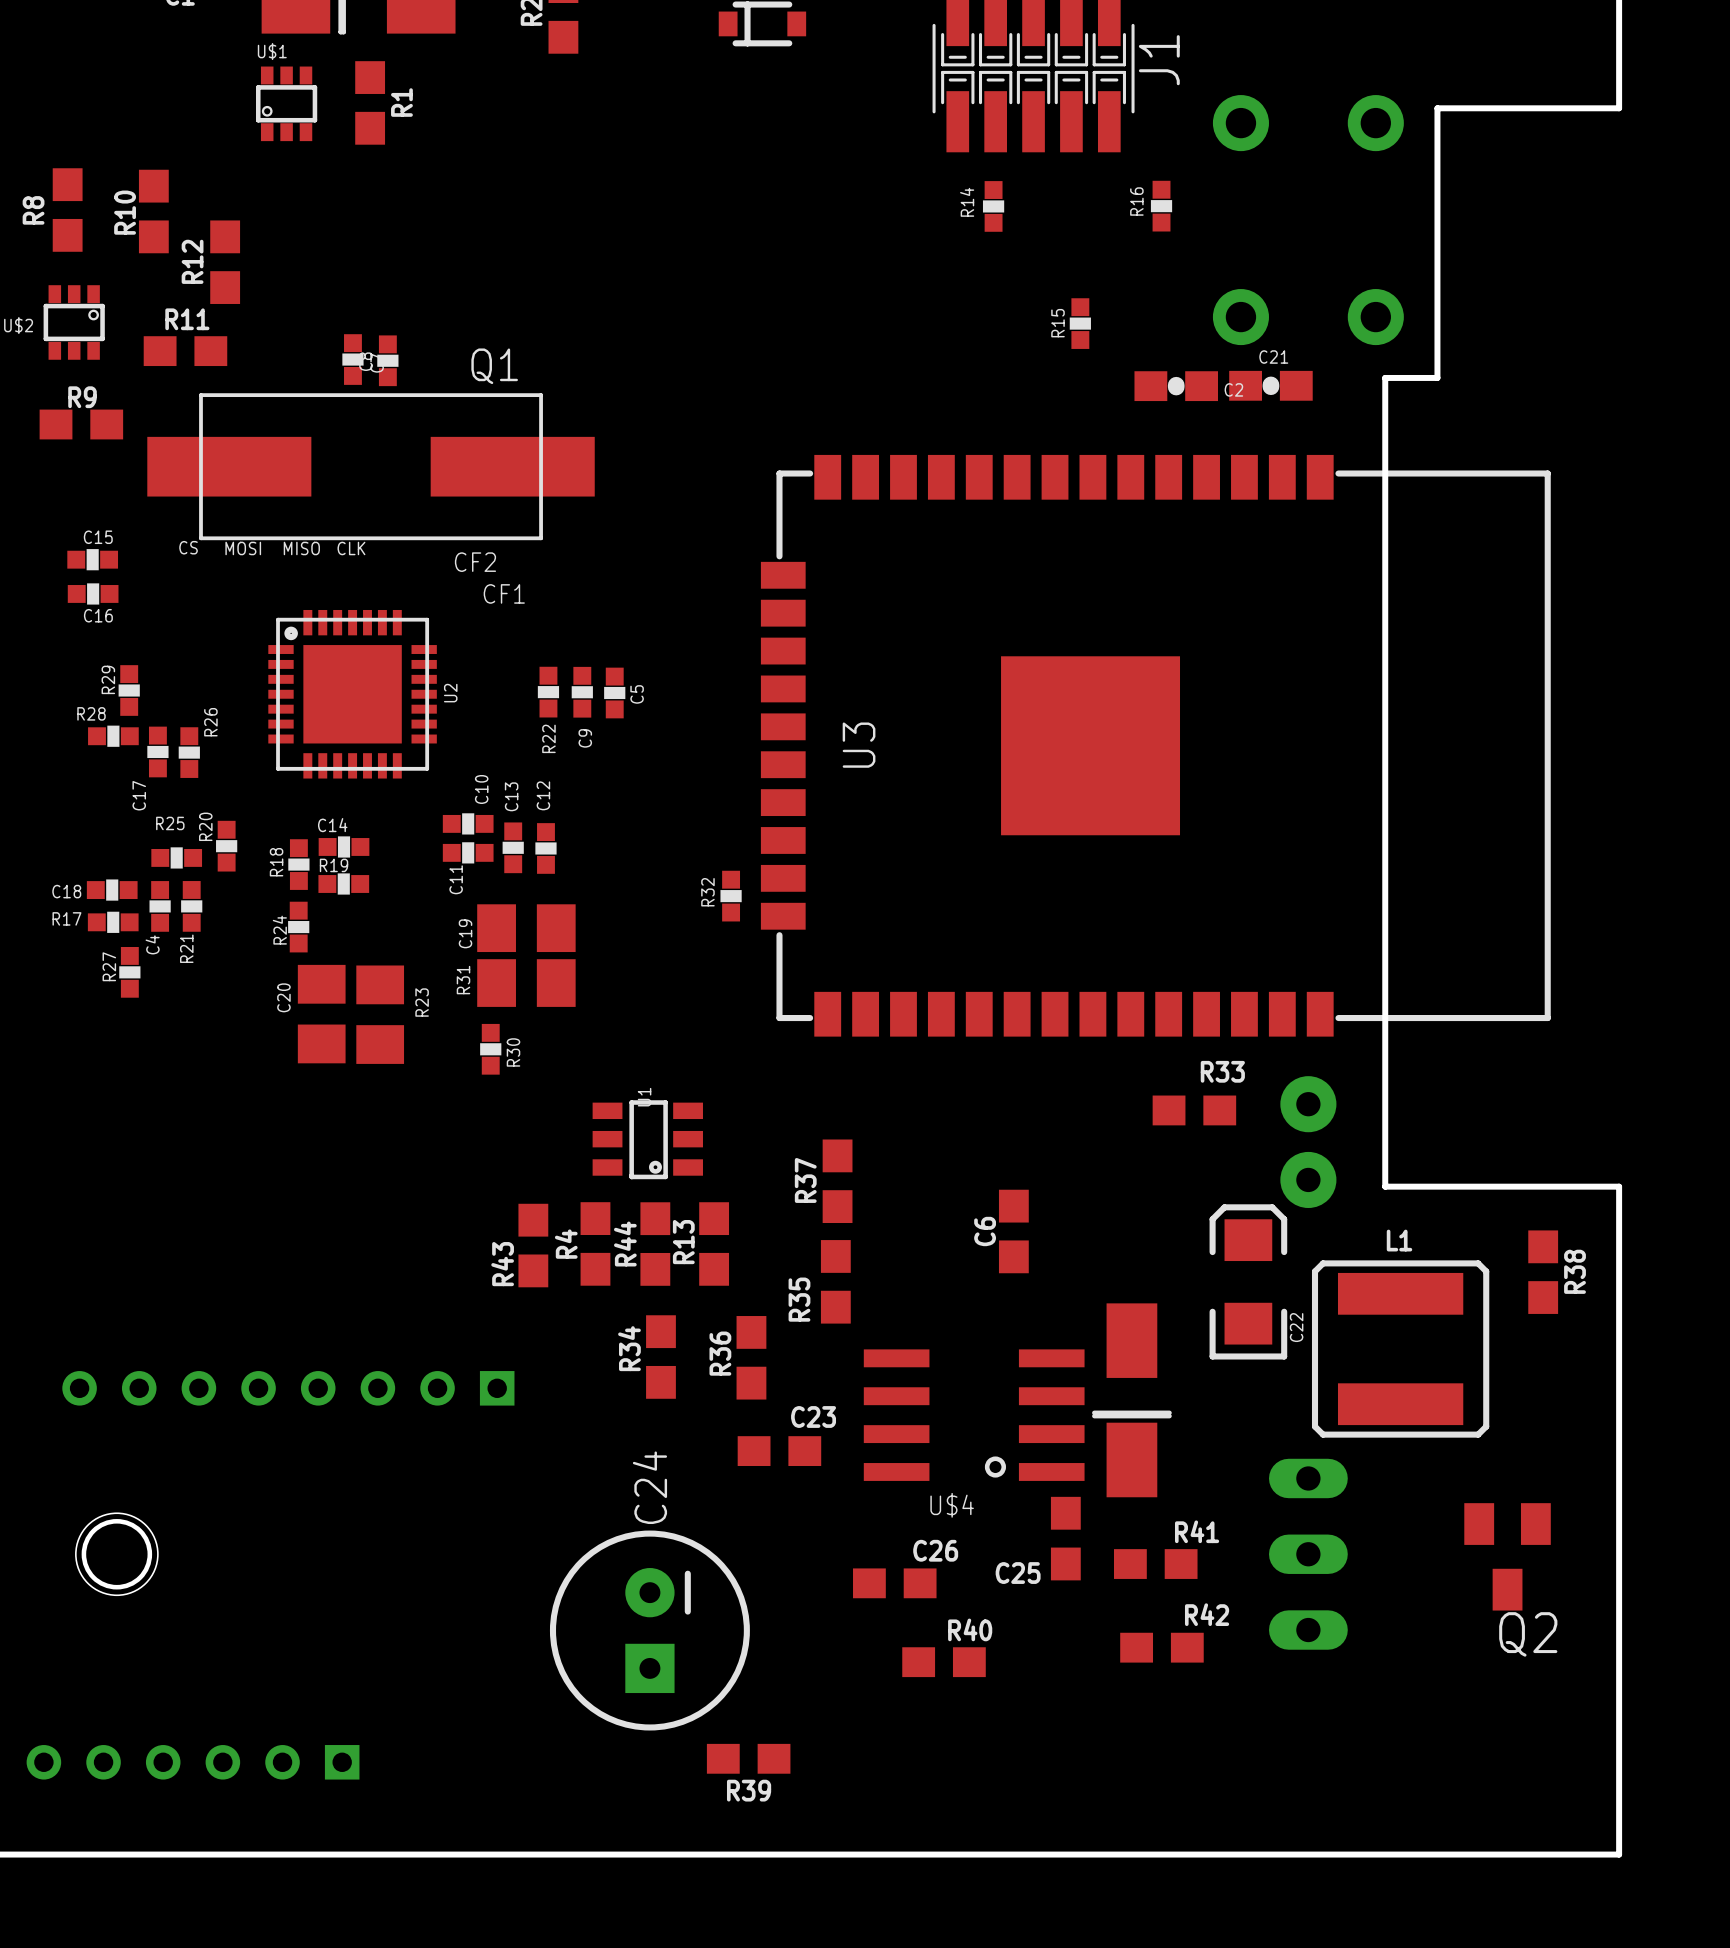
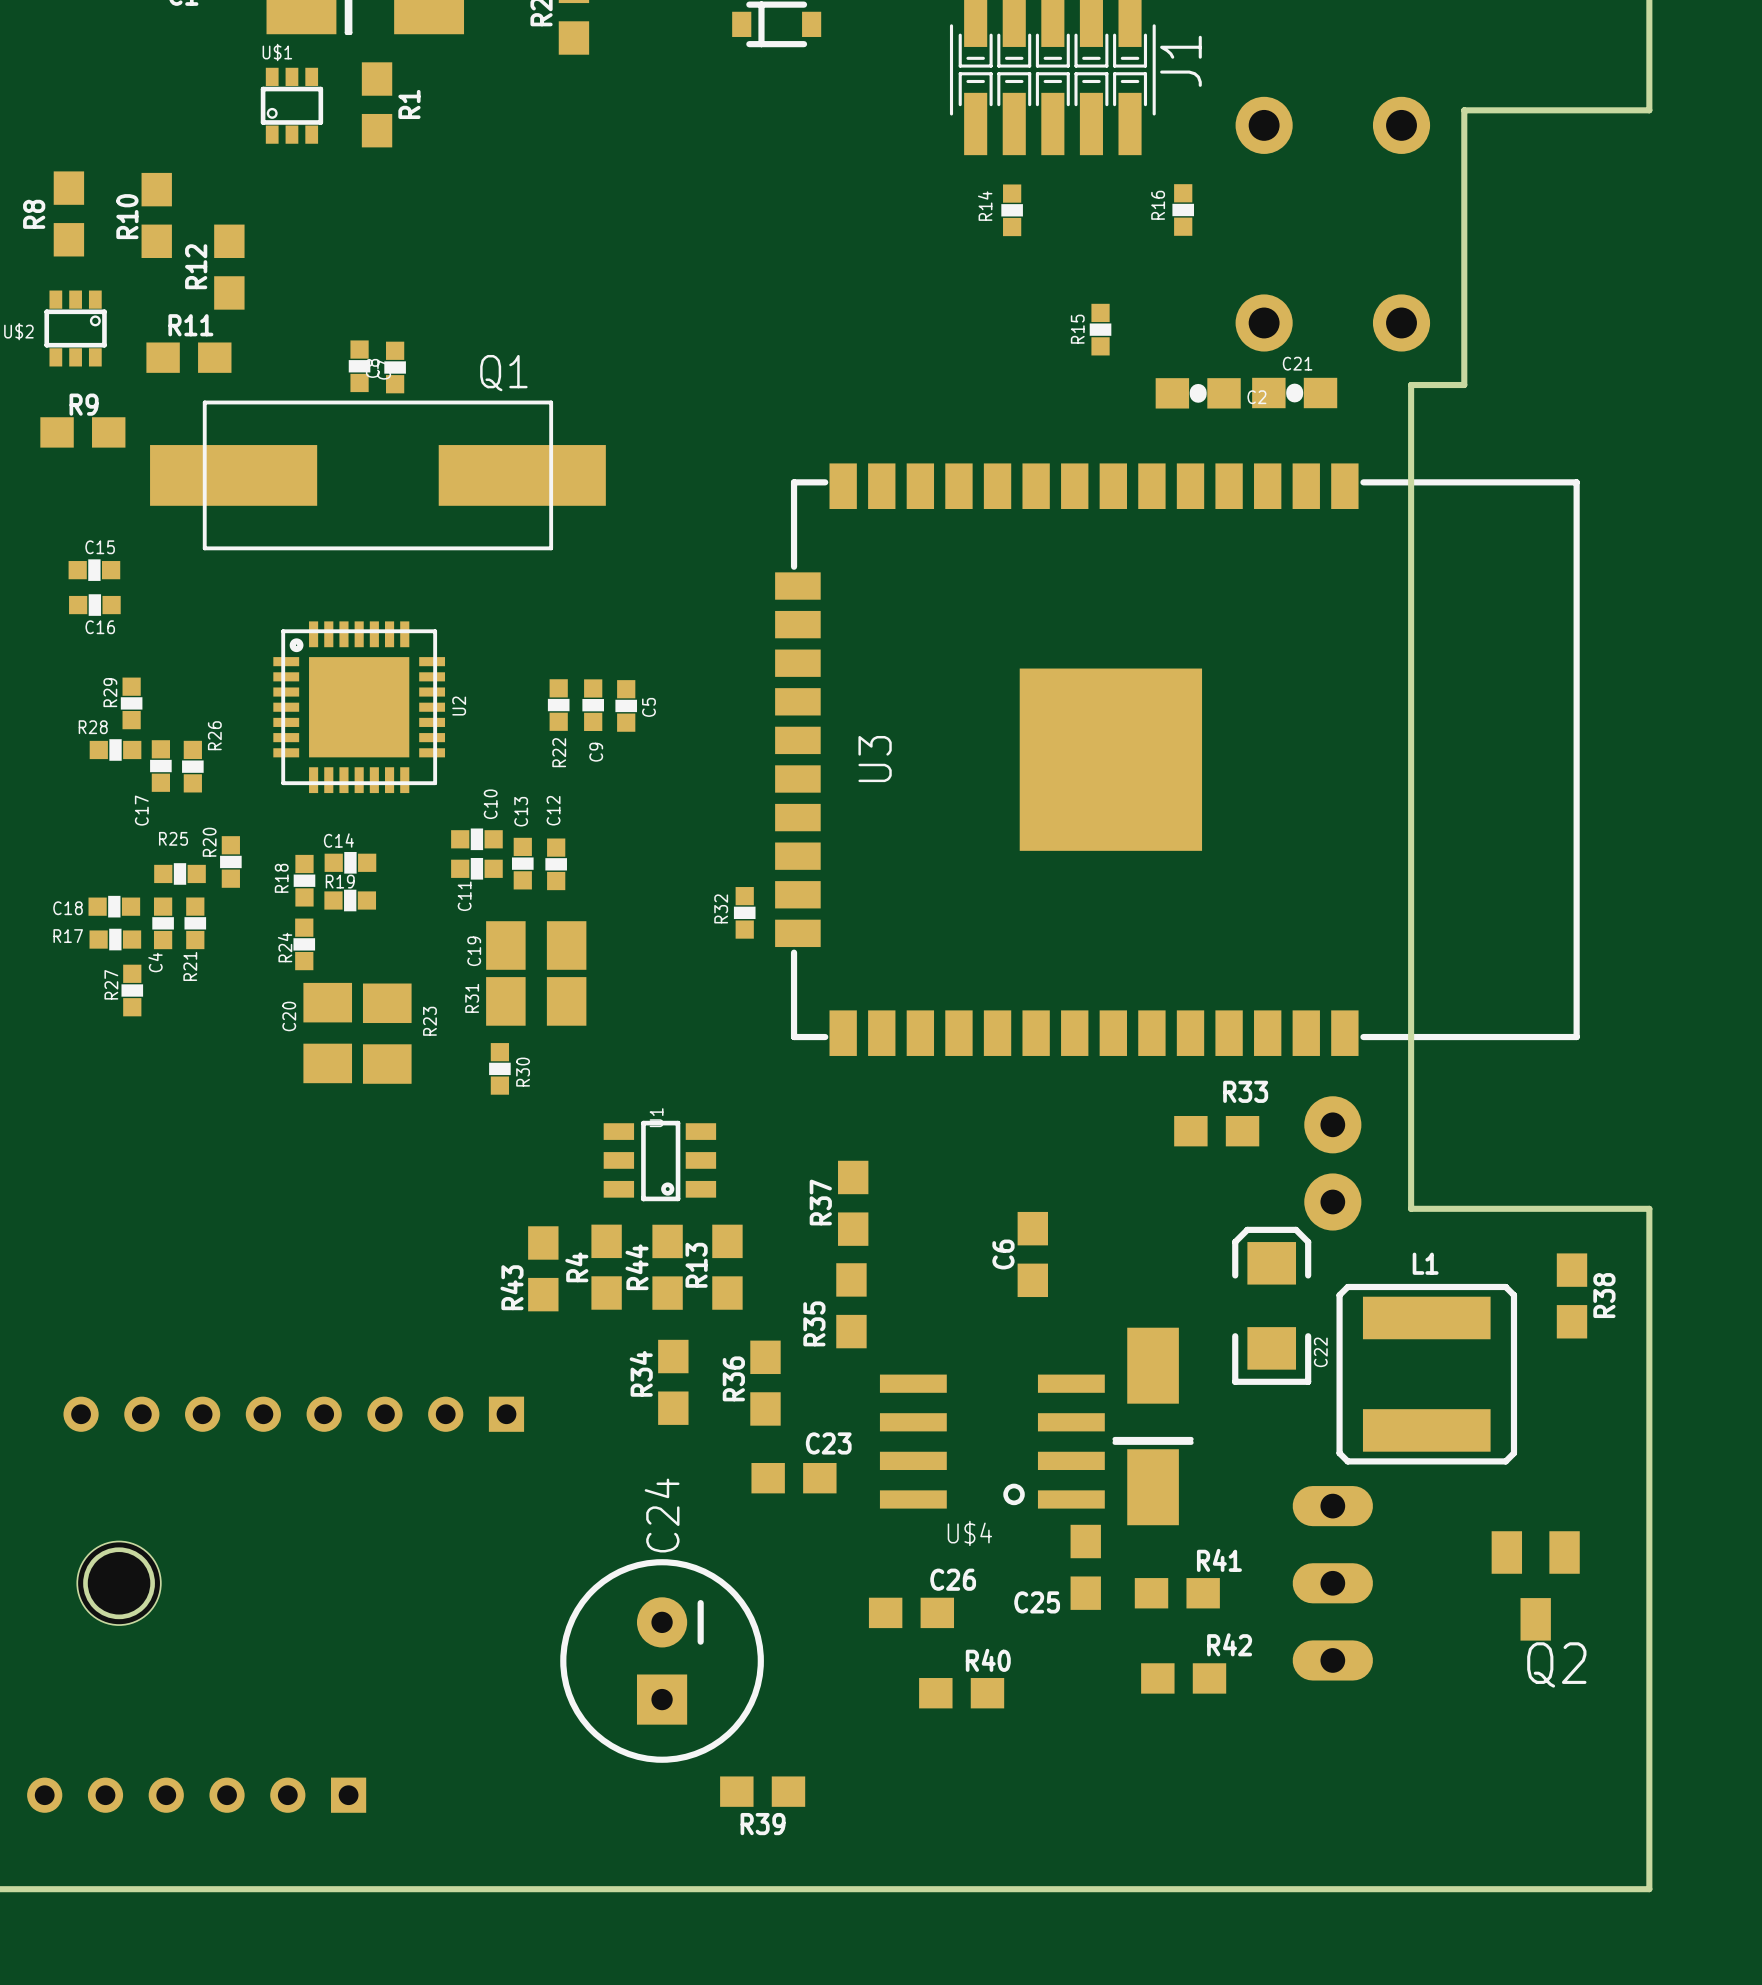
text: CS (188, 547) -> none
text: MOSI (243, 548) -> none
text: MISO (301, 548) -> none
text: CLK (351, 548) -> none
text: CF2 (475, 562) -> none
text: CF1 (504, 593) -> none

